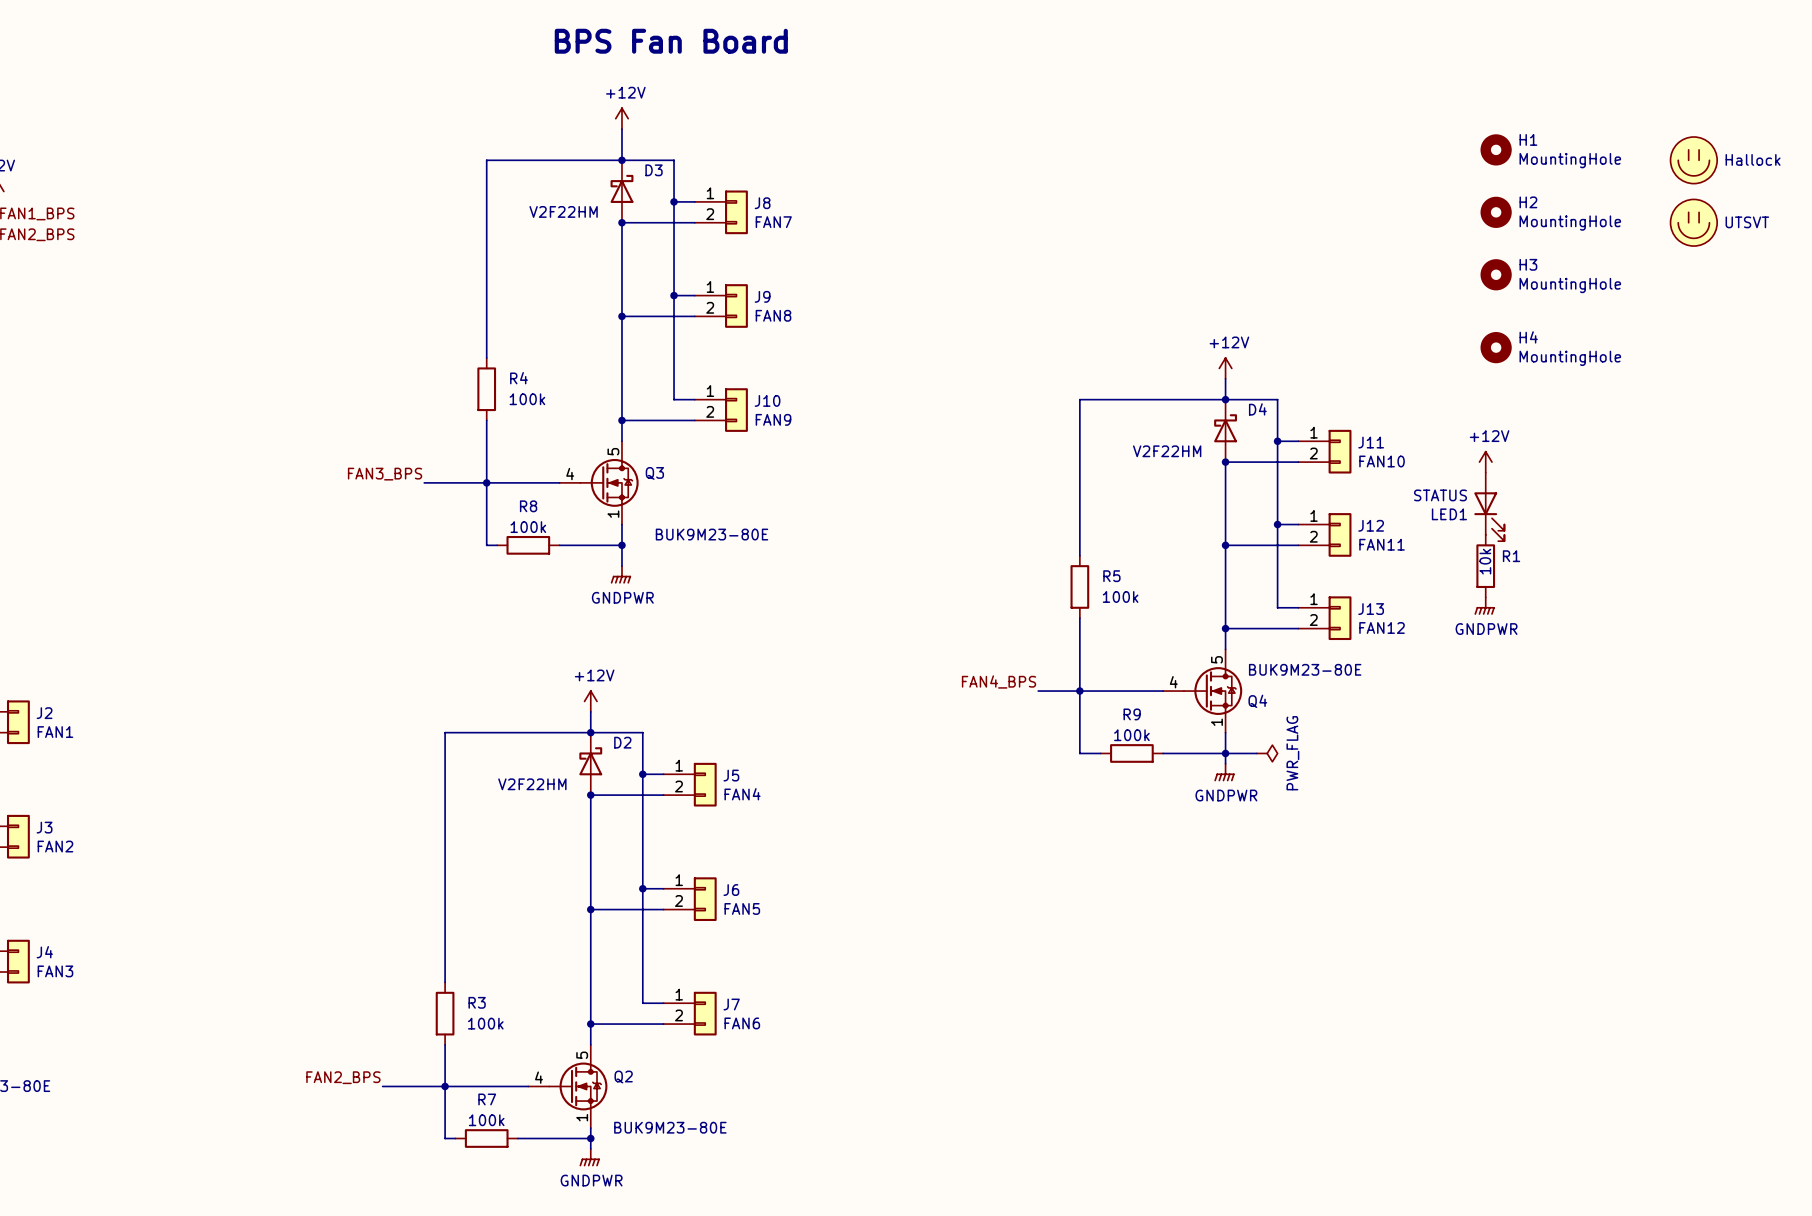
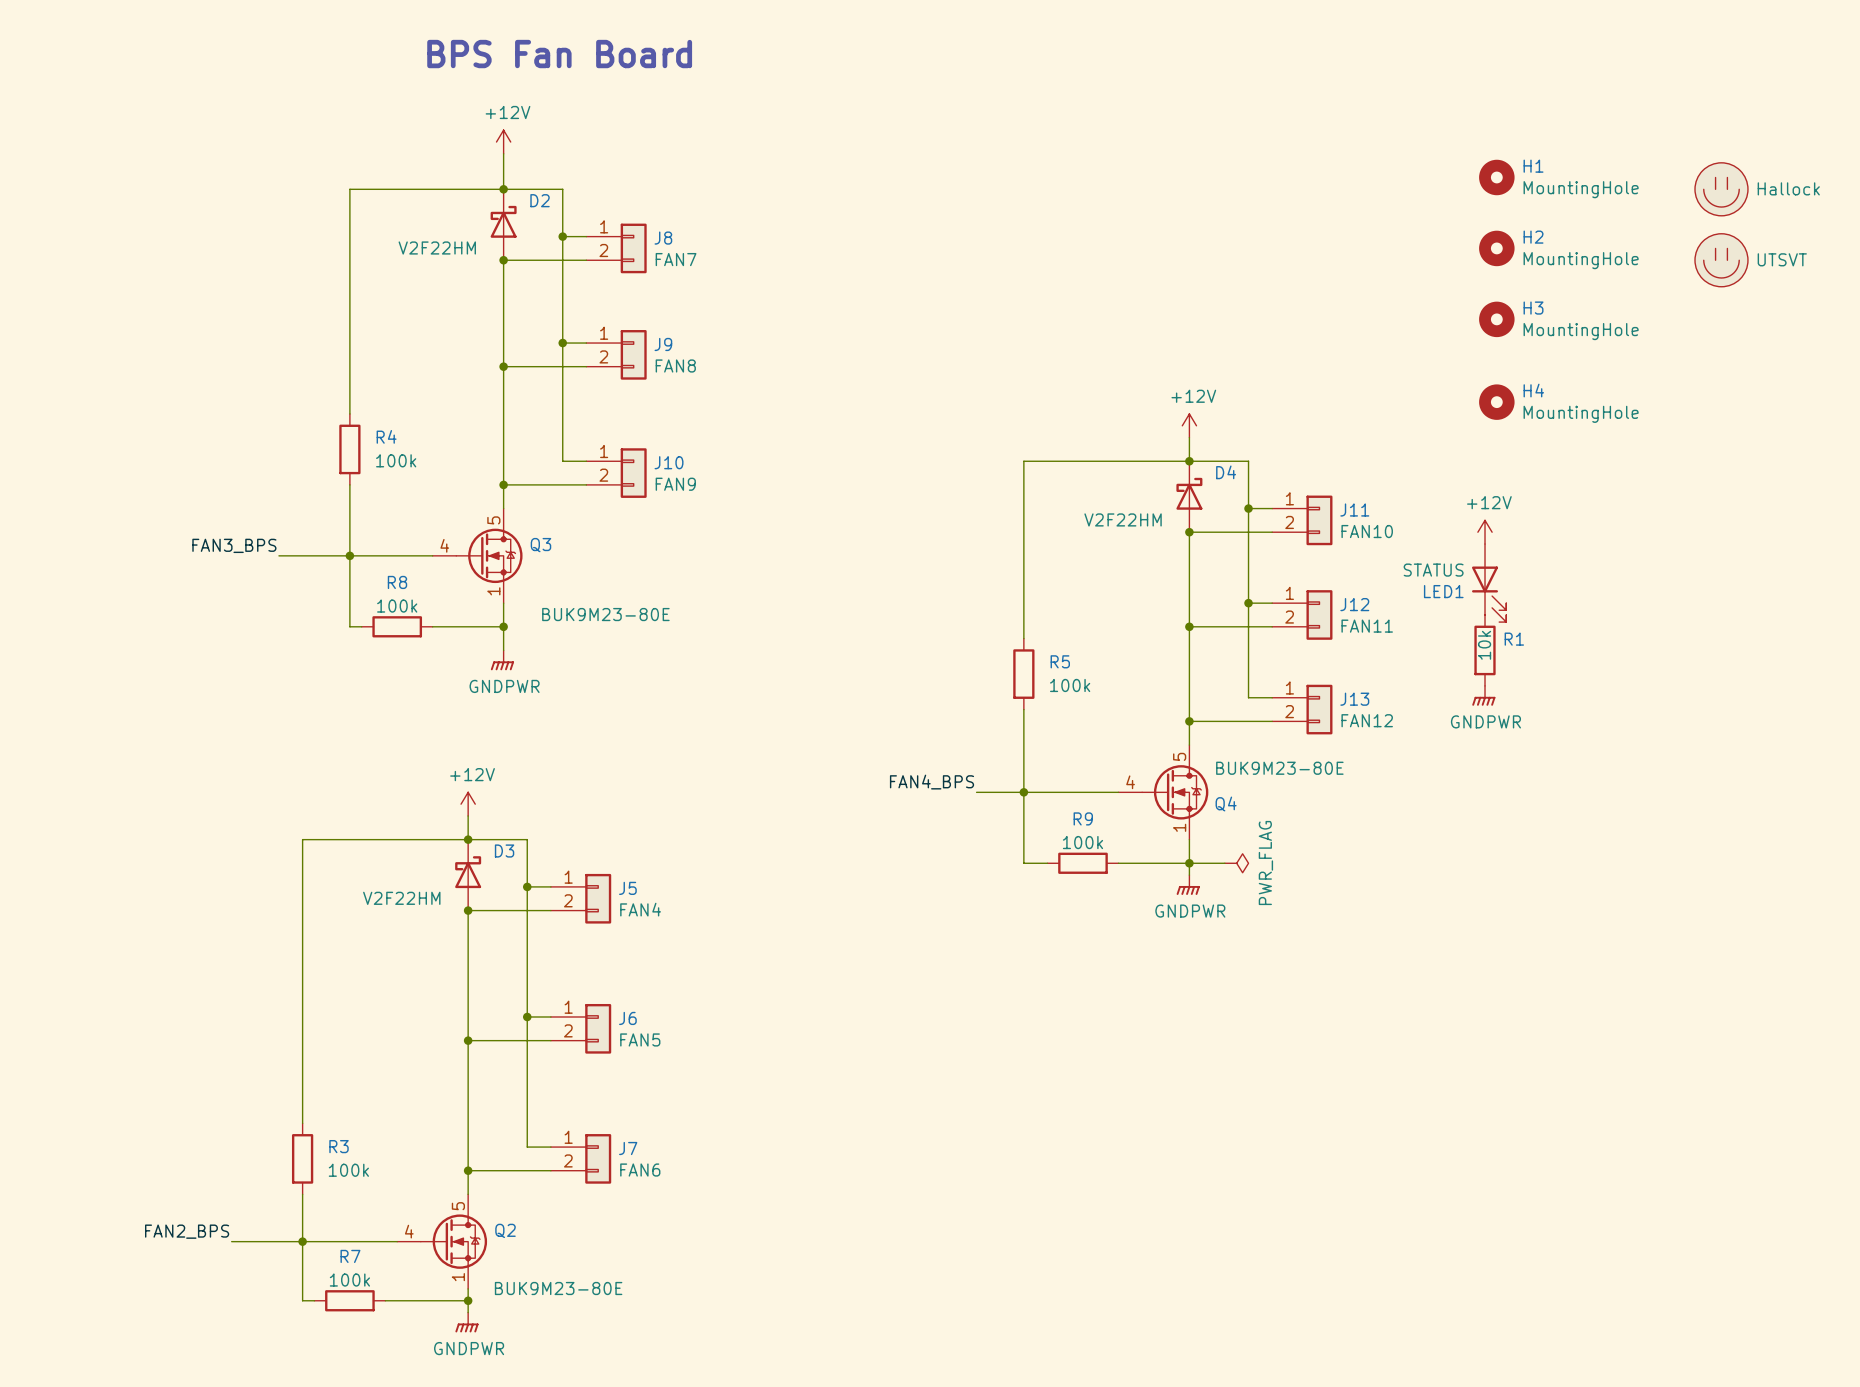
D3 name: D3 (654, 170) -> D2 (540, 200)
D2 name: D2 (622, 742) -> D3 (504, 851)

